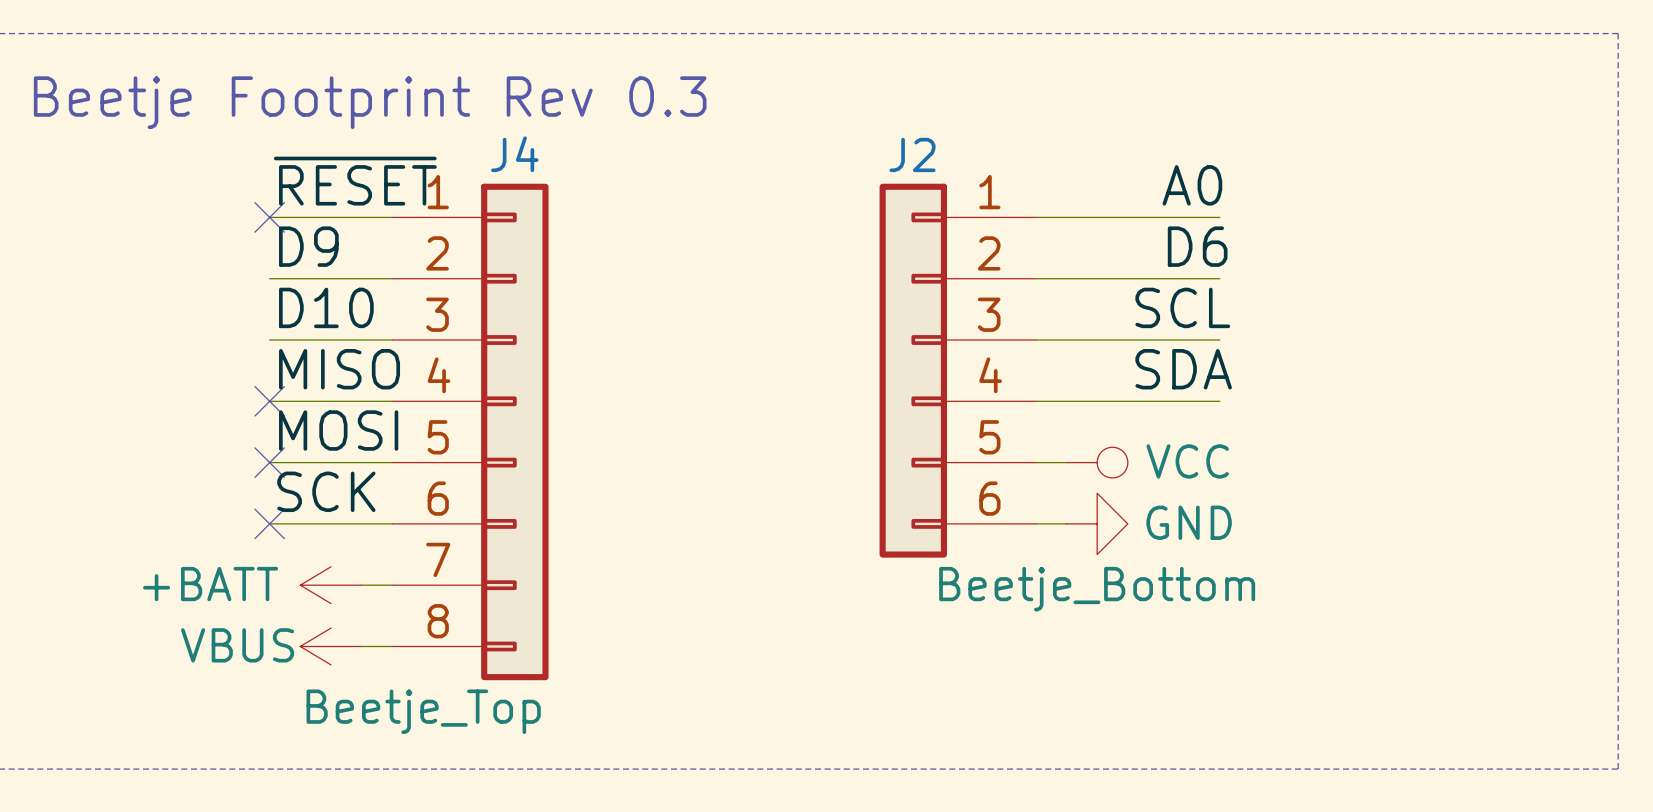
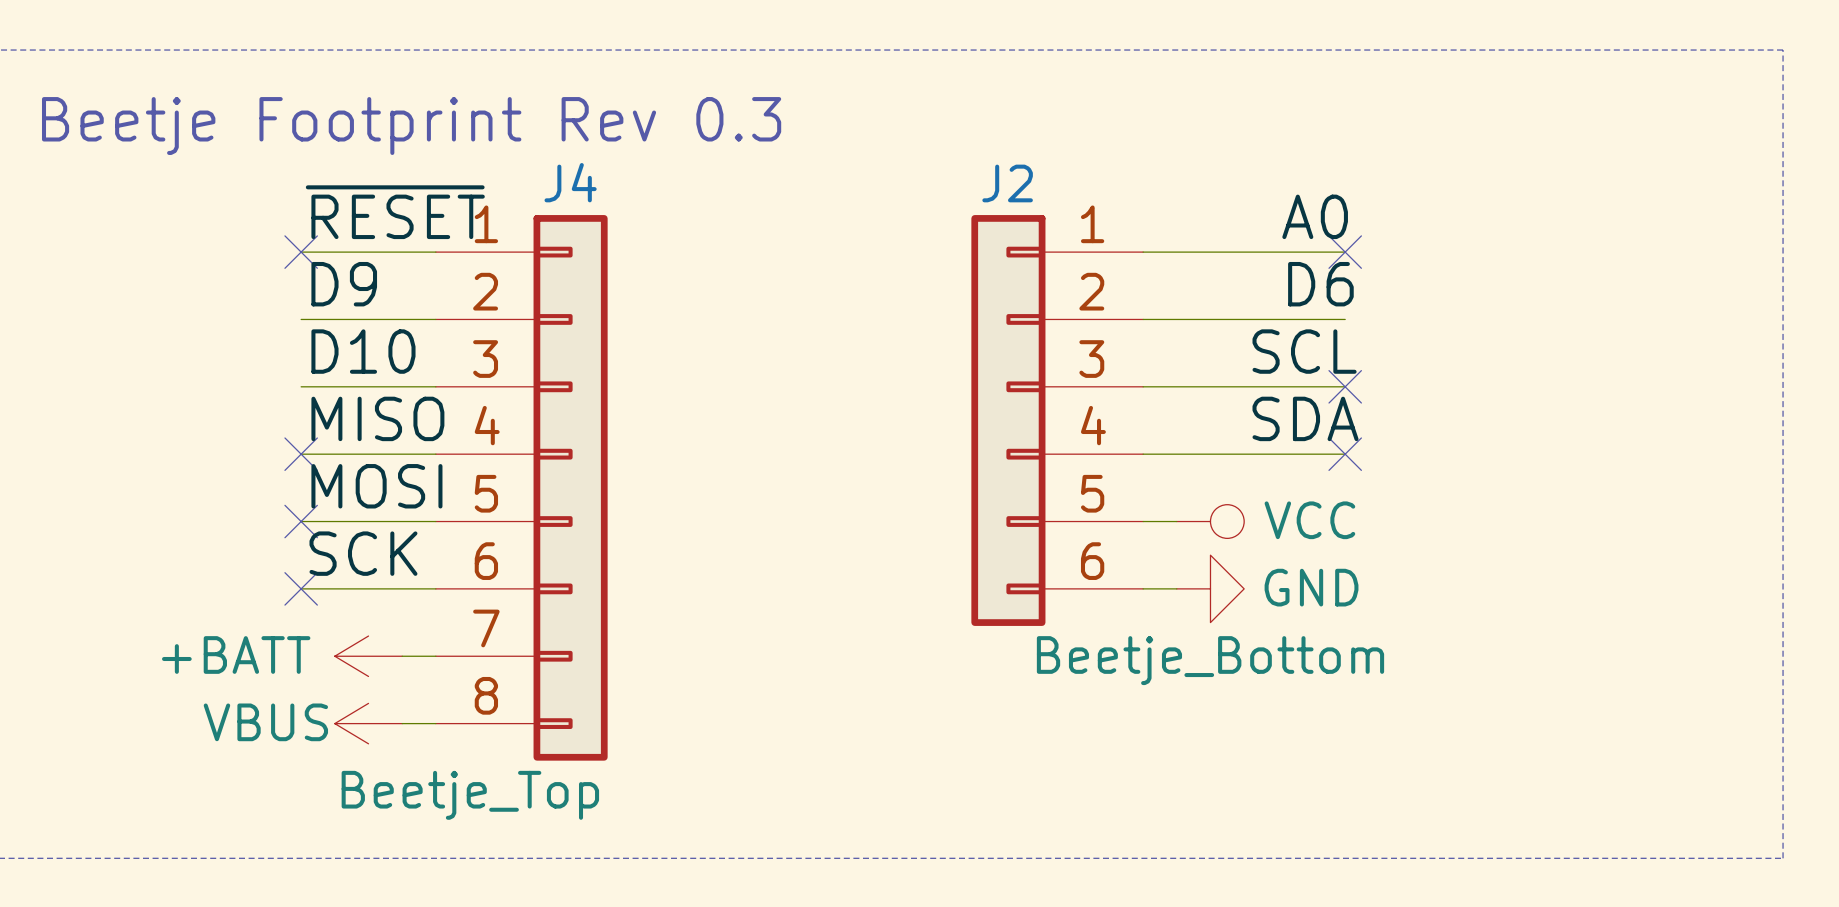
no-connect mark: none -> (1345, 252)
no-connect mark: none -> (1345, 386)
no-connect mark: none -> (1345, 454)

